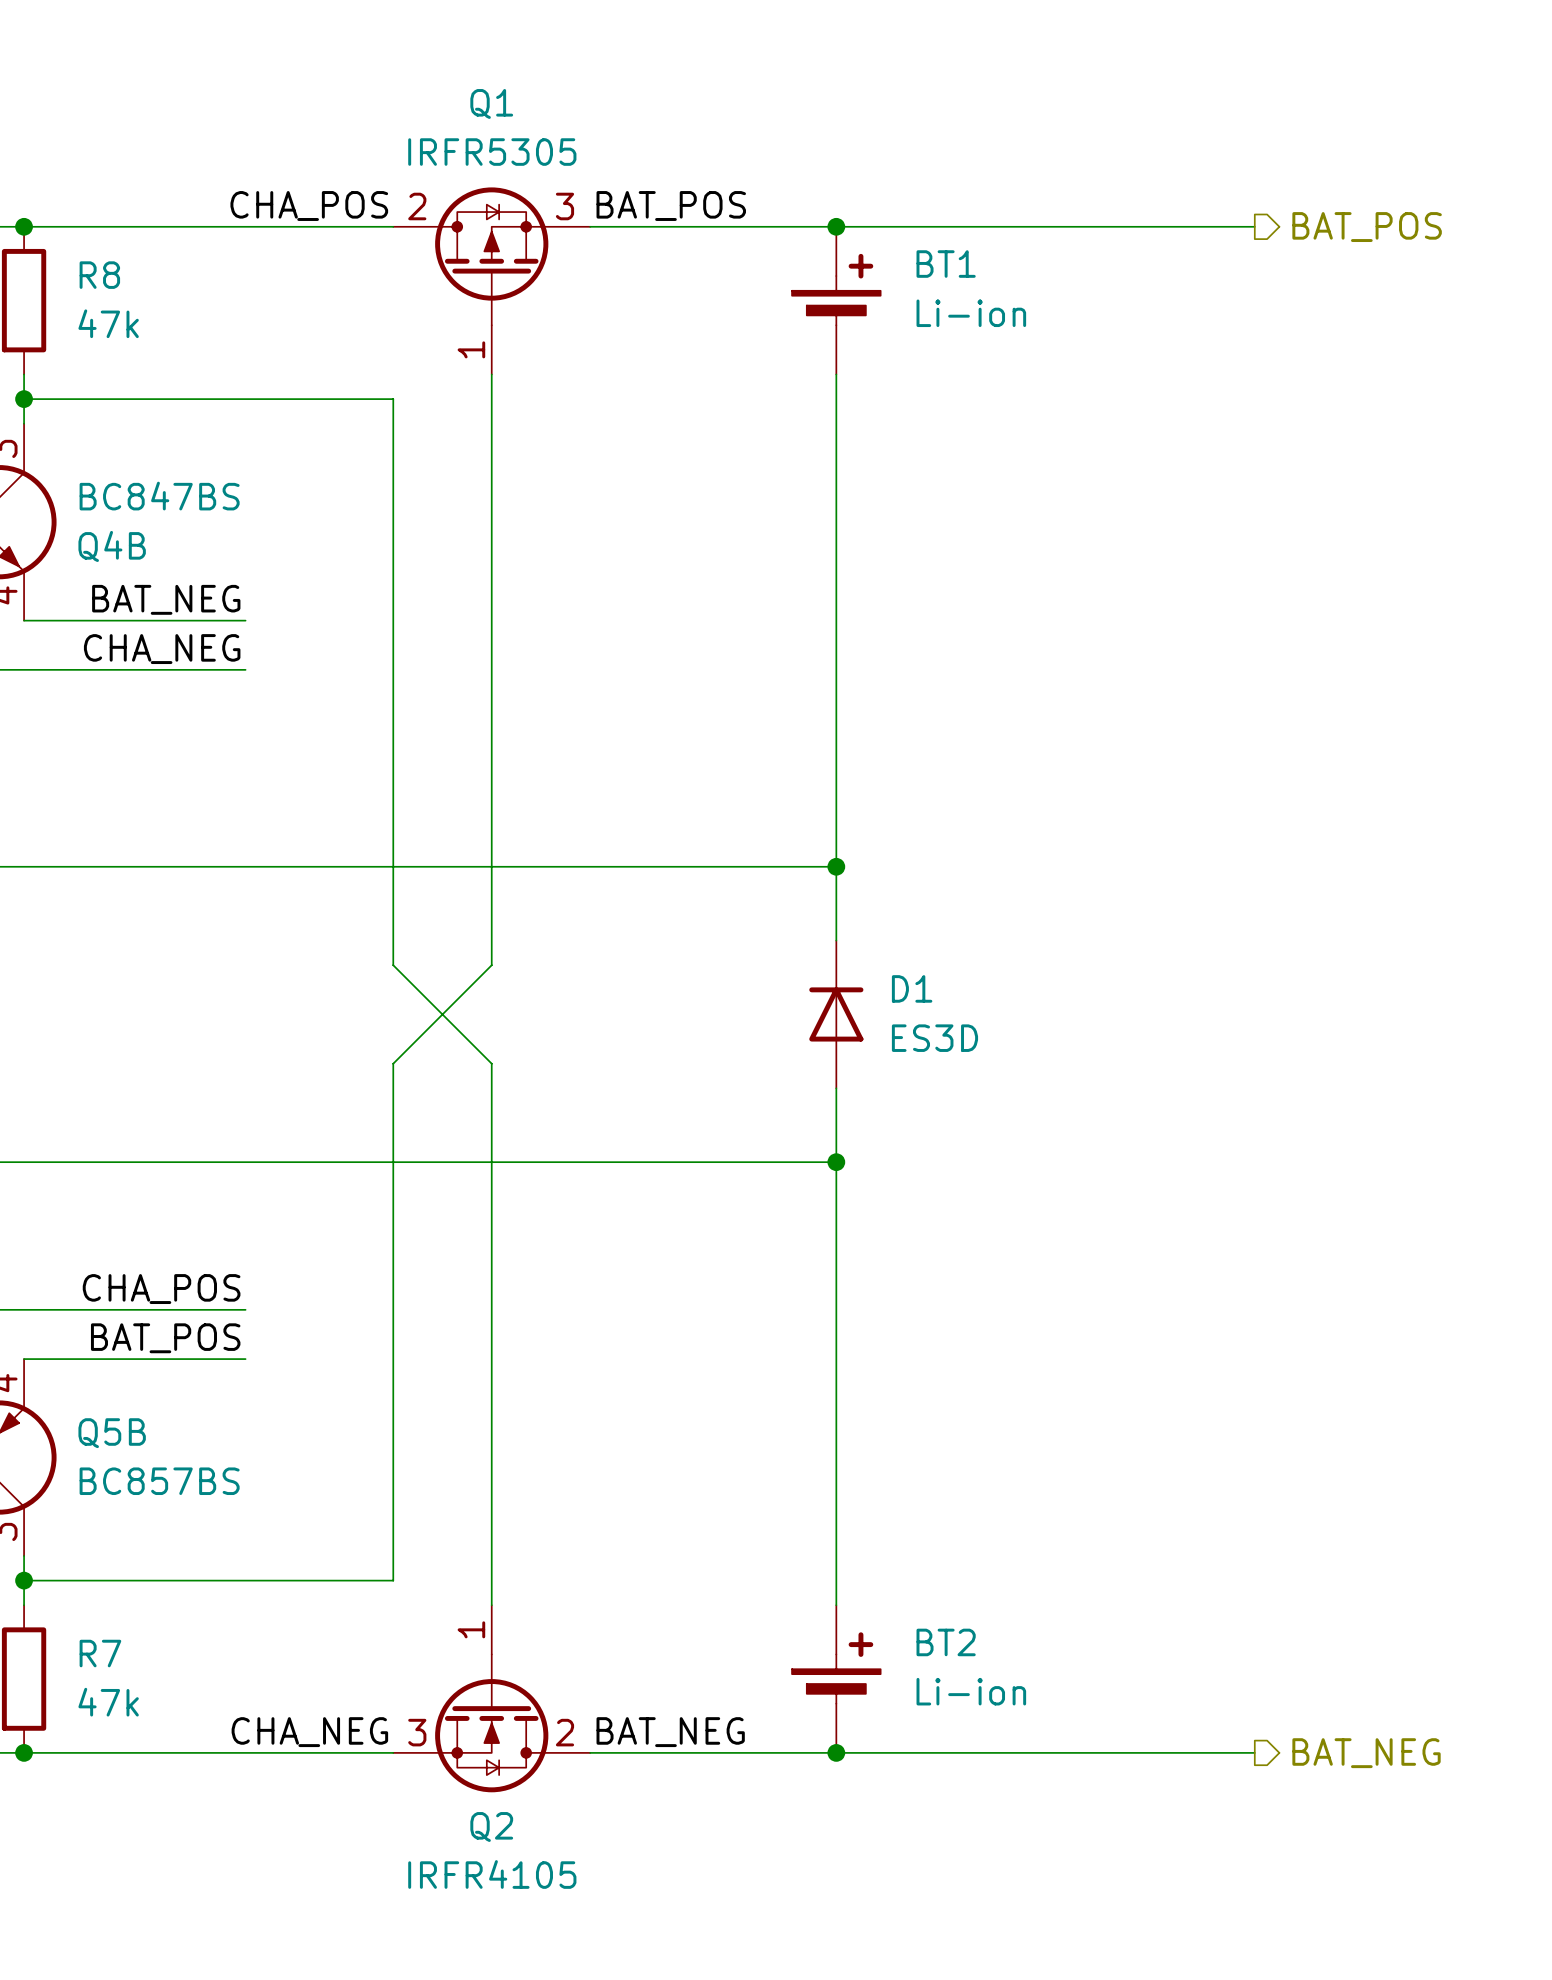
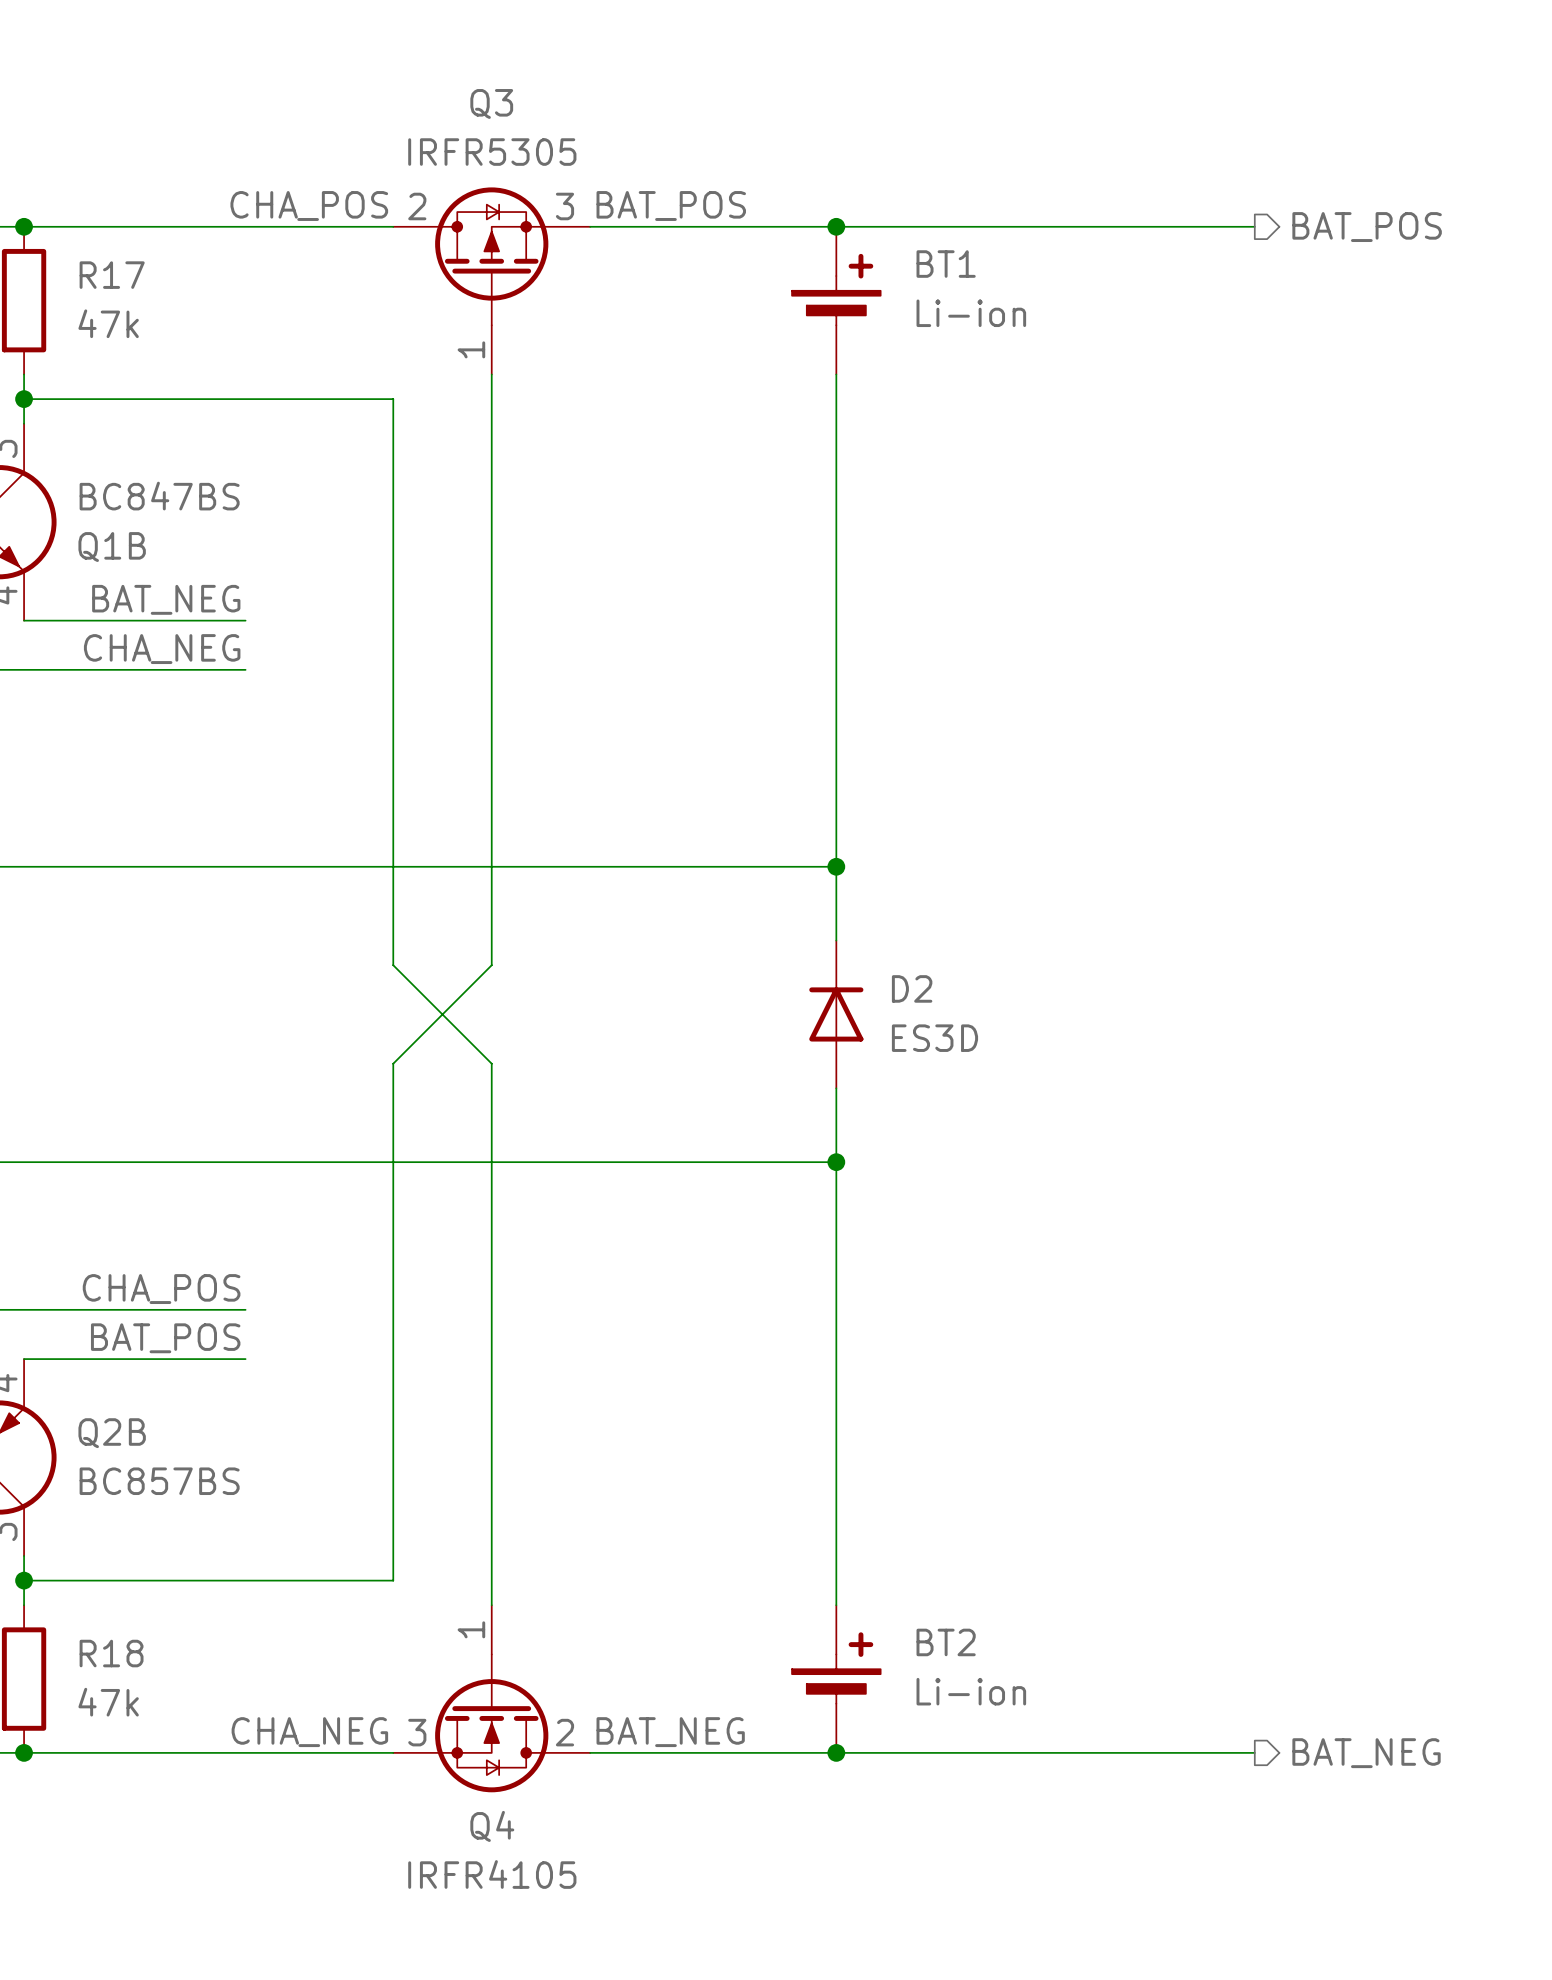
Q1 name: Q1 (491, 103) -> Q3 (491, 103)
R8 name: R8 (99, 275) -> R17 (112, 275)
Q4B name: Q4B (112, 546) -> Q1B (112, 547)
D1 name: D1 (912, 988) -> D2 (912, 988)
Q5B name: Q5B (112, 1433) -> Q2B (112, 1433)
R7 name: R7 (100, 1653) -> R18 (111, 1653)
Q2 name: Q2 (491, 1827) -> Q4 (492, 1826)

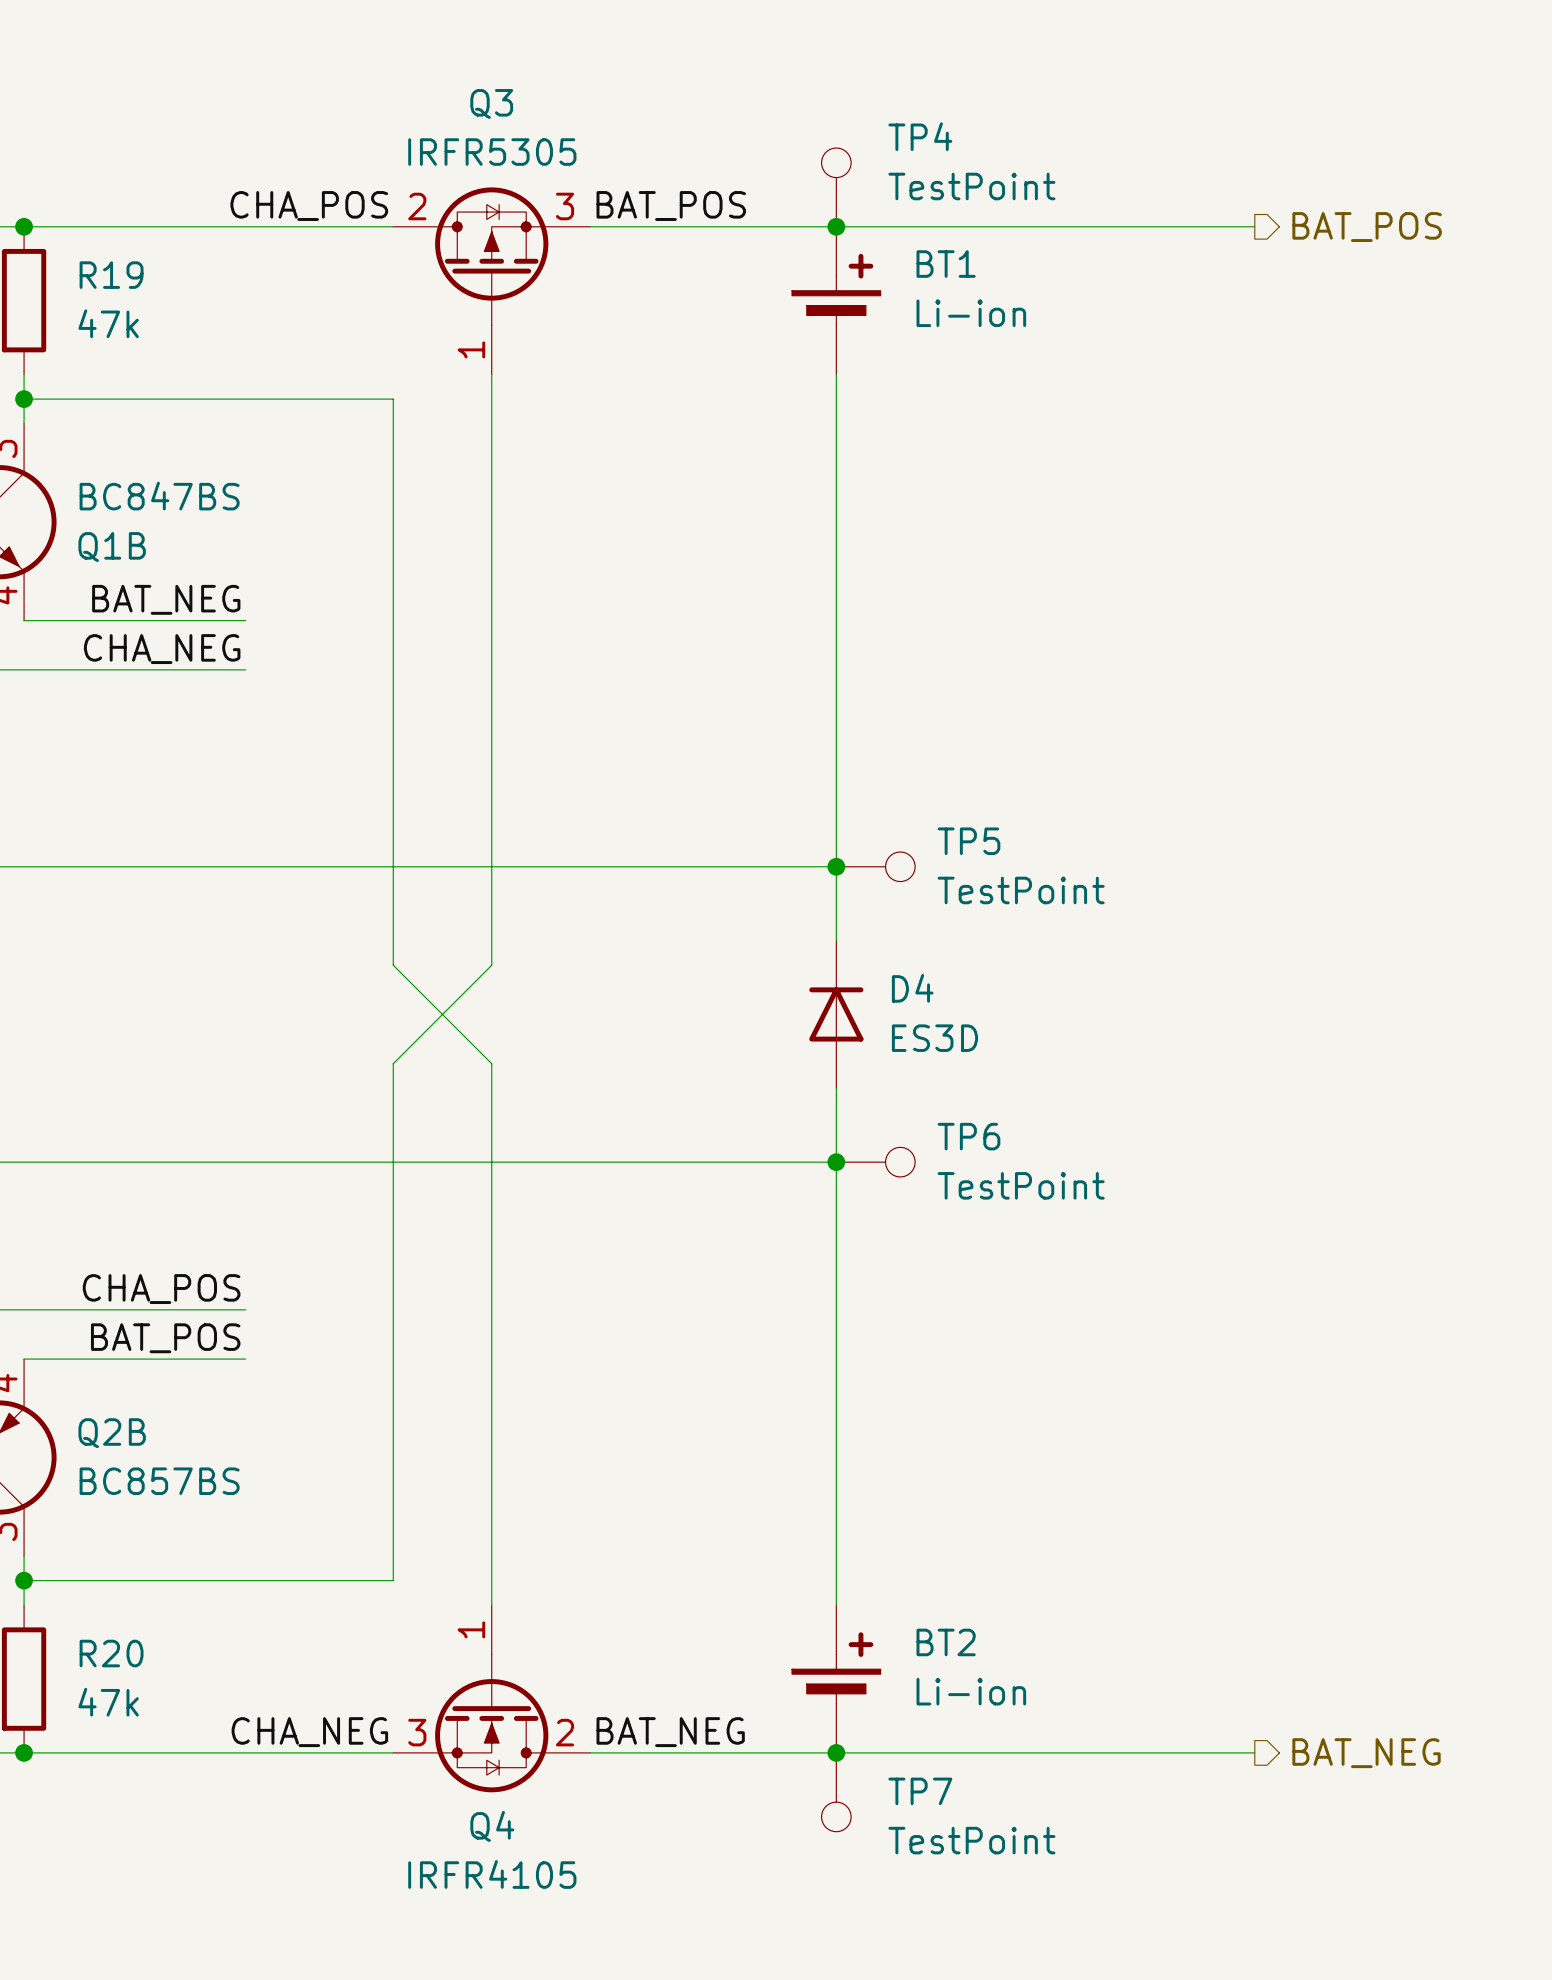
TP4: none -> TestPoint (836, 187)
R17 name: R17 (112, 275) -> R19 (111, 275)
TP5: none -> TestPoint (875, 866)
D2 name: D2 (912, 988) -> D4 (912, 988)
TP6: none -> TestPoint (875, 1162)
R18 name: R18 (111, 1653) -> R20 (111, 1653)
TP7: none -> TestPoint (836, 1792)

